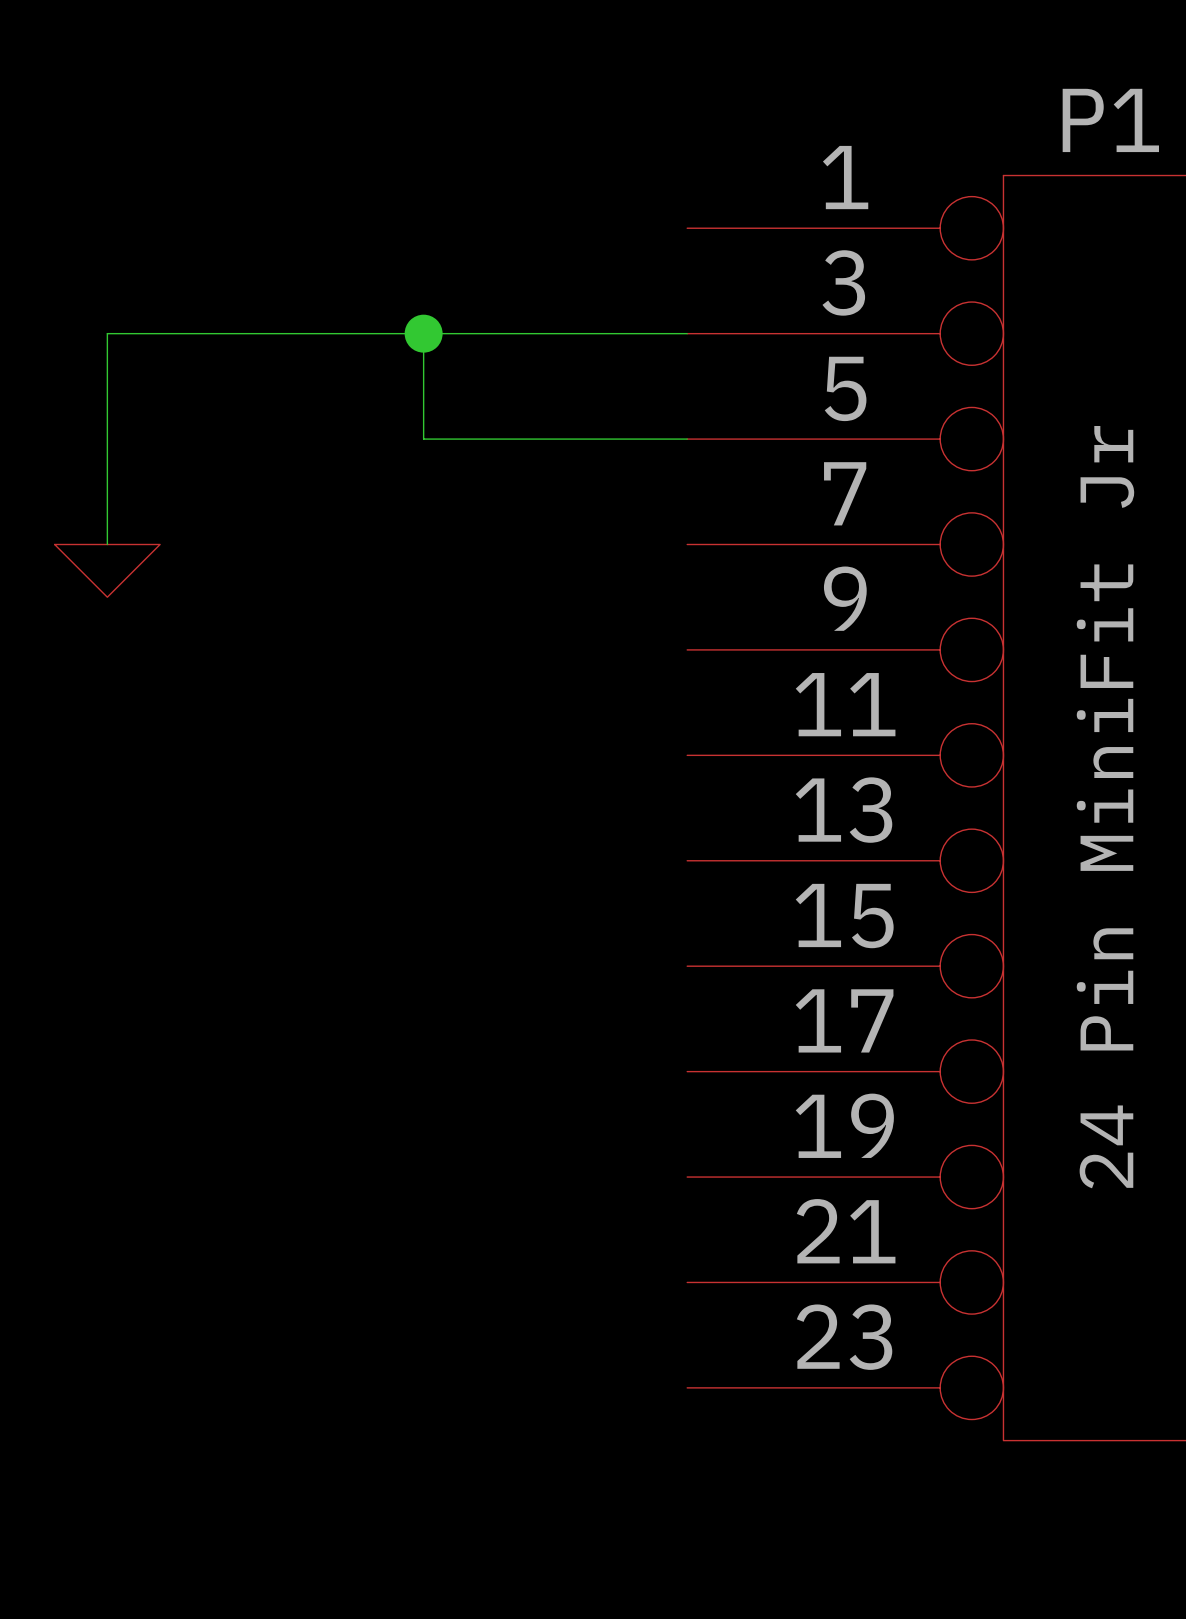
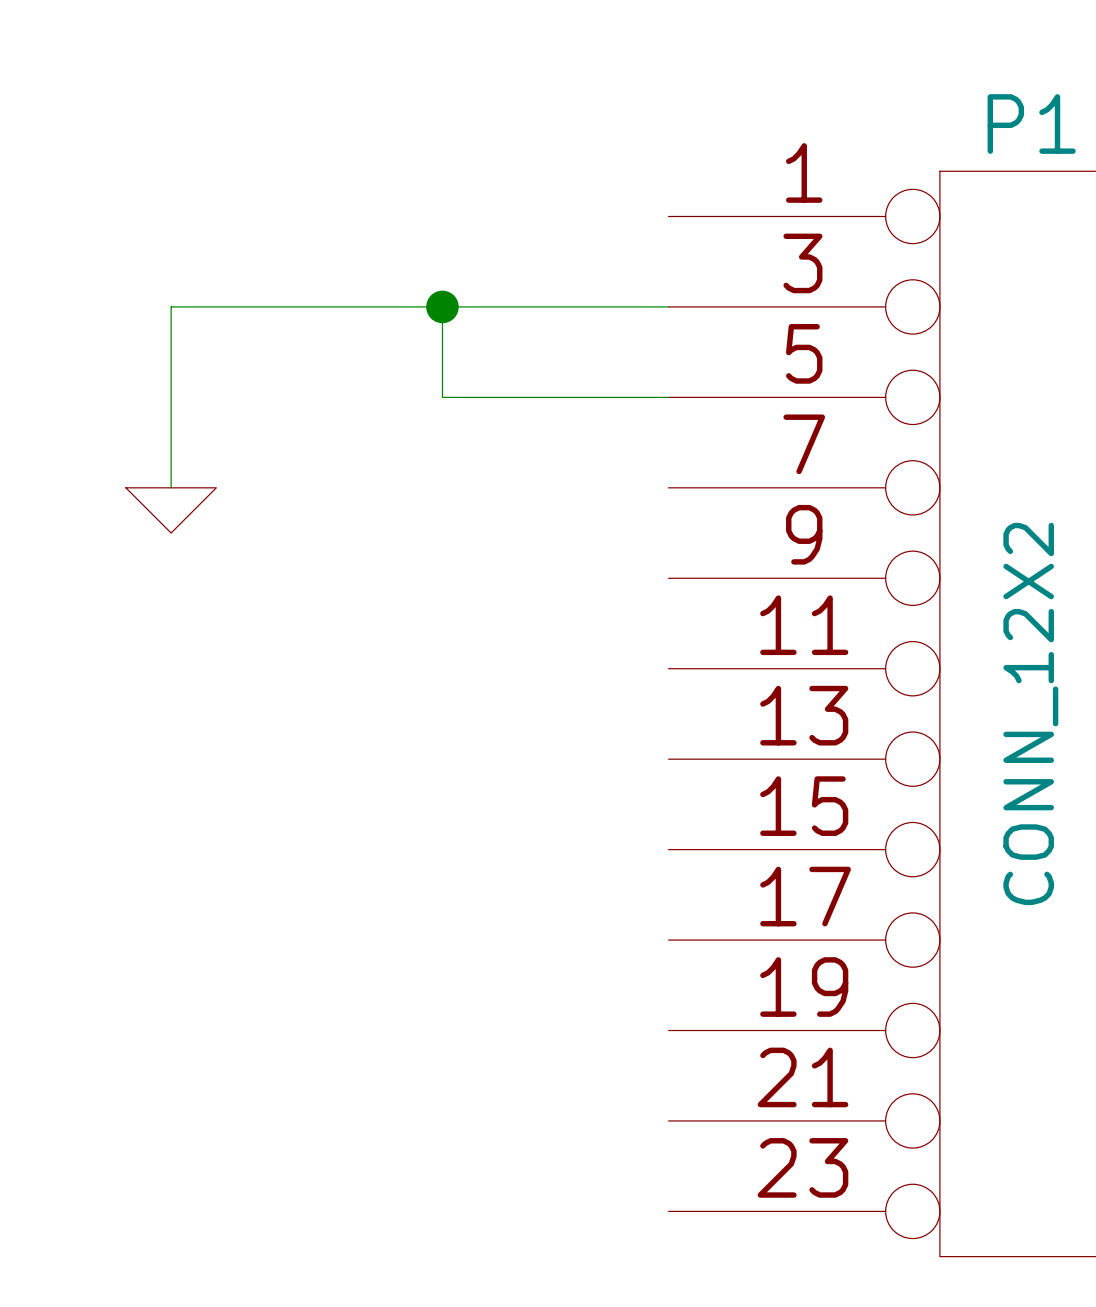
P1 value: 24 Pin MiniFit Jr (1105, 807) -> CONN_12X2 (1030, 713)

